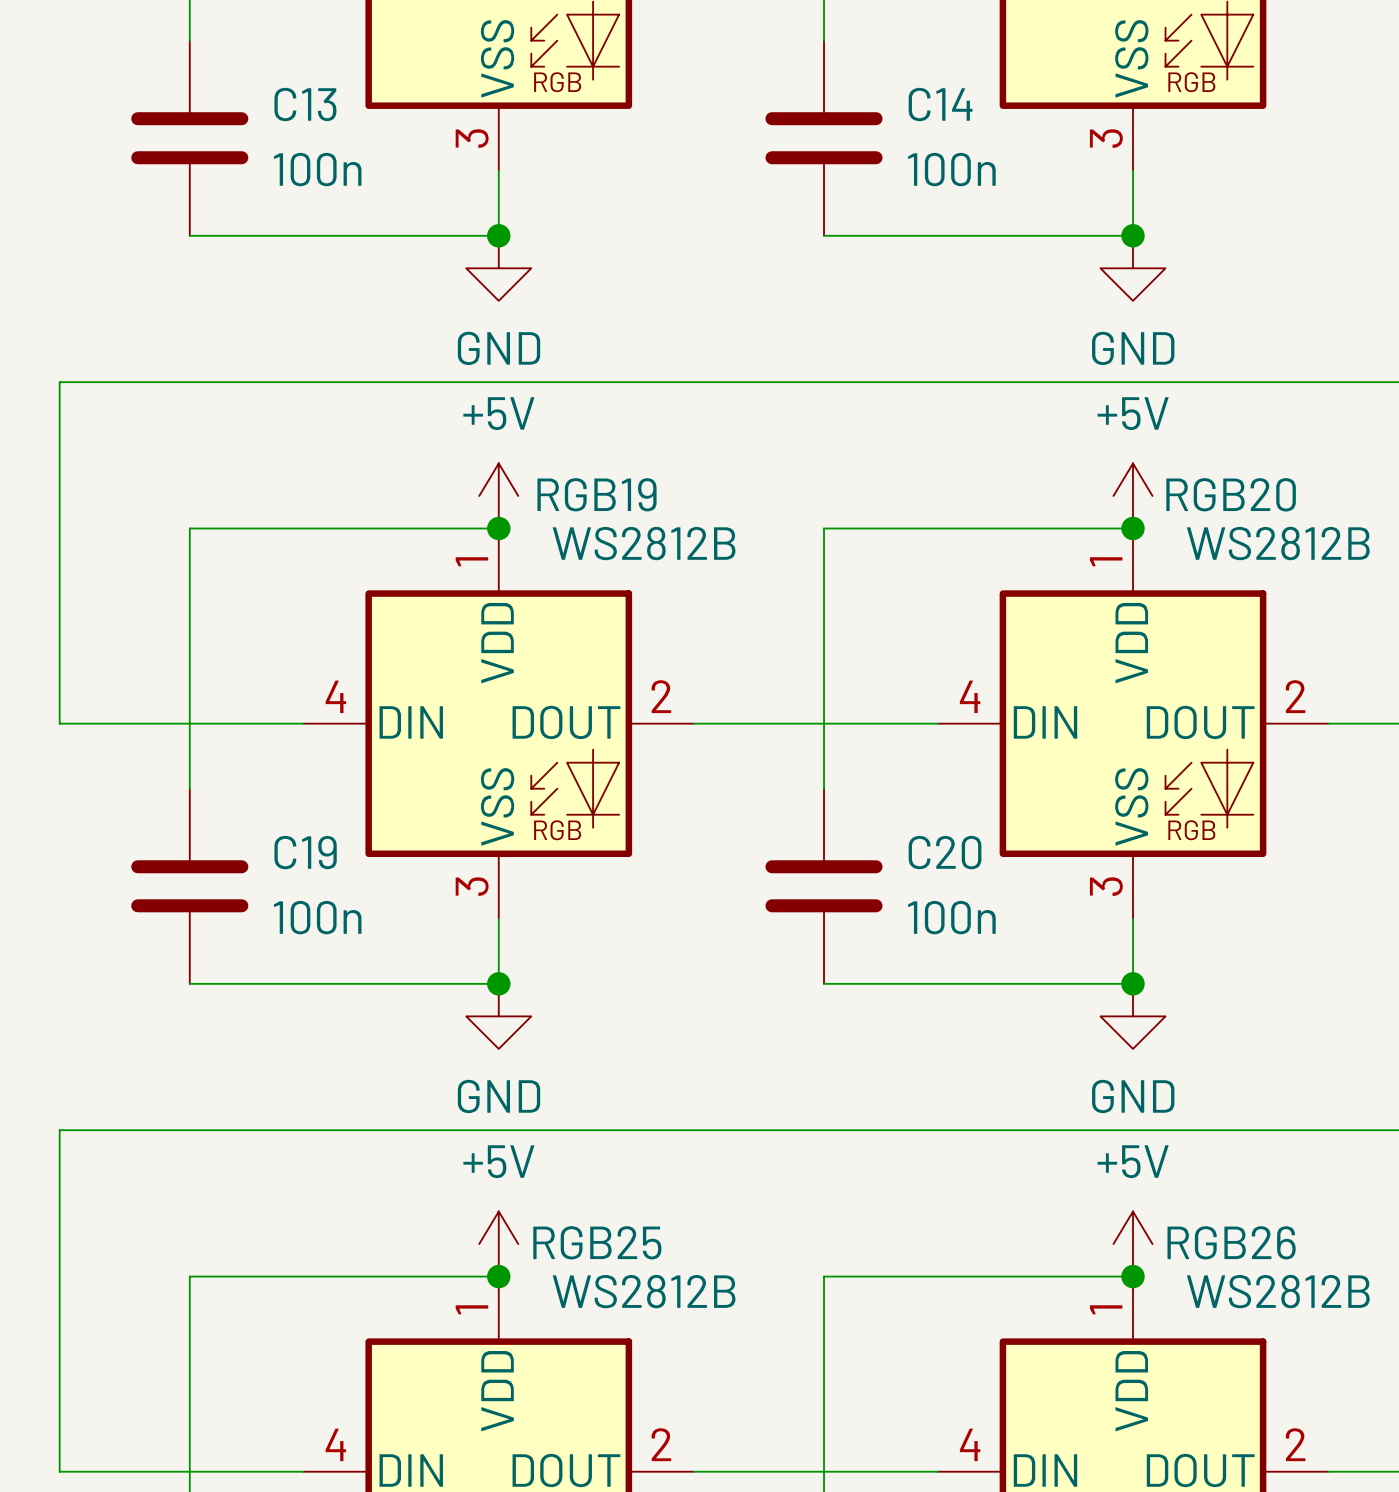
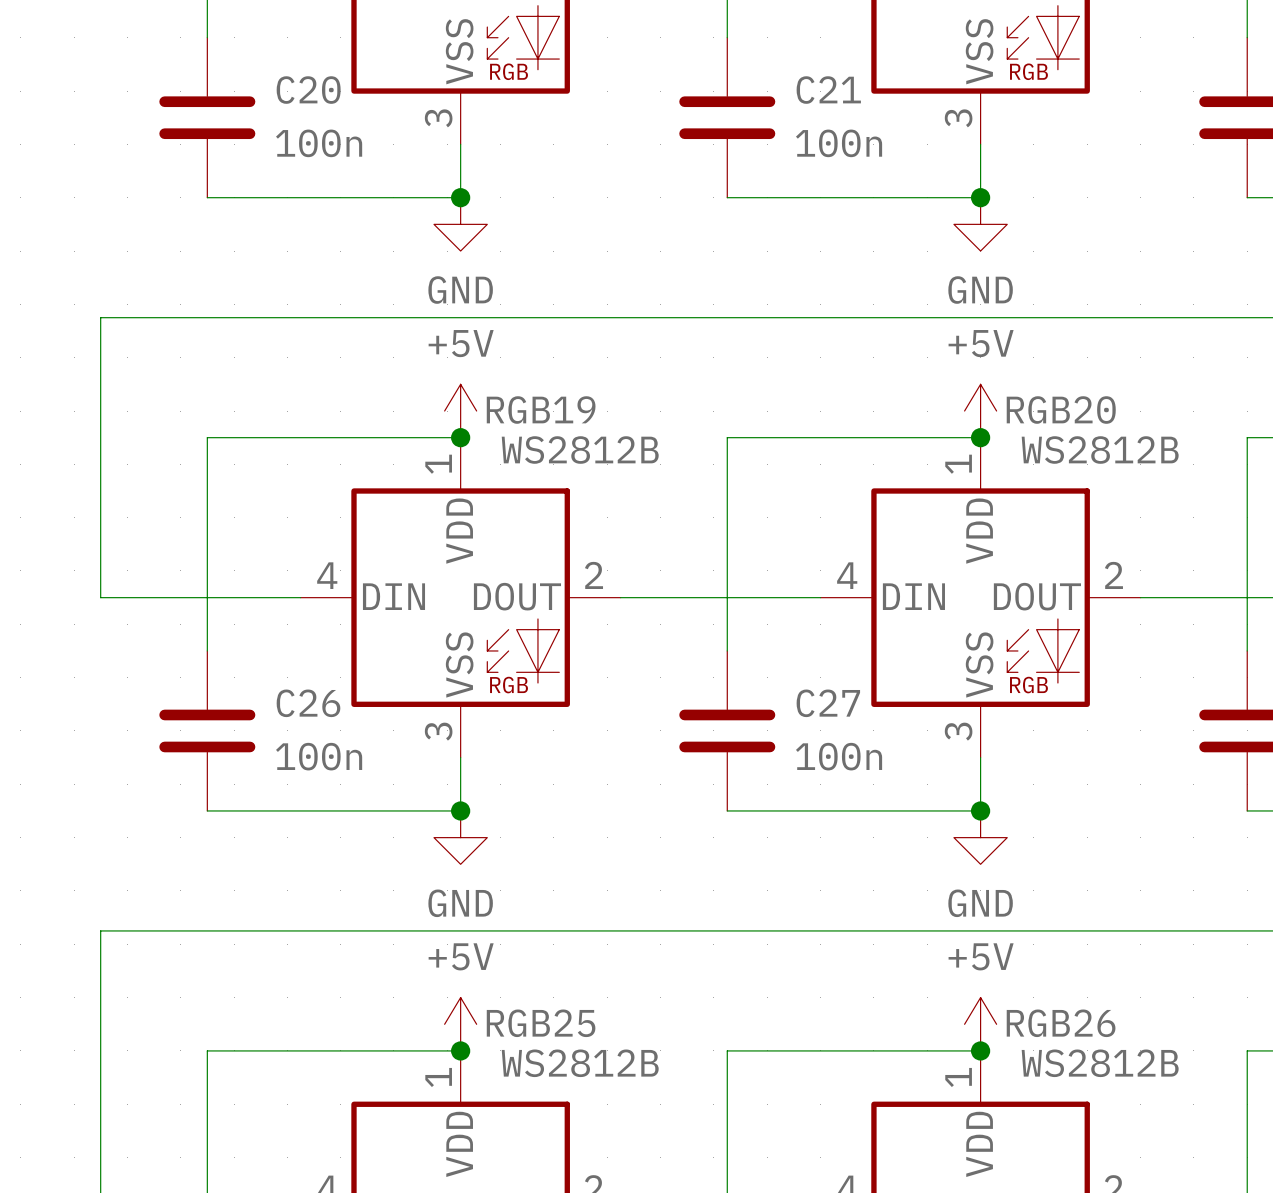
C13 name: C13 (305, 104) -> C20 (308, 90)
C14 name: C14 (940, 104) -> C21 (828, 90)
C19 name: C19 (305, 852) -> C26 (308, 703)
C20 name: C20 (945, 852) -> C27 (828, 703)

